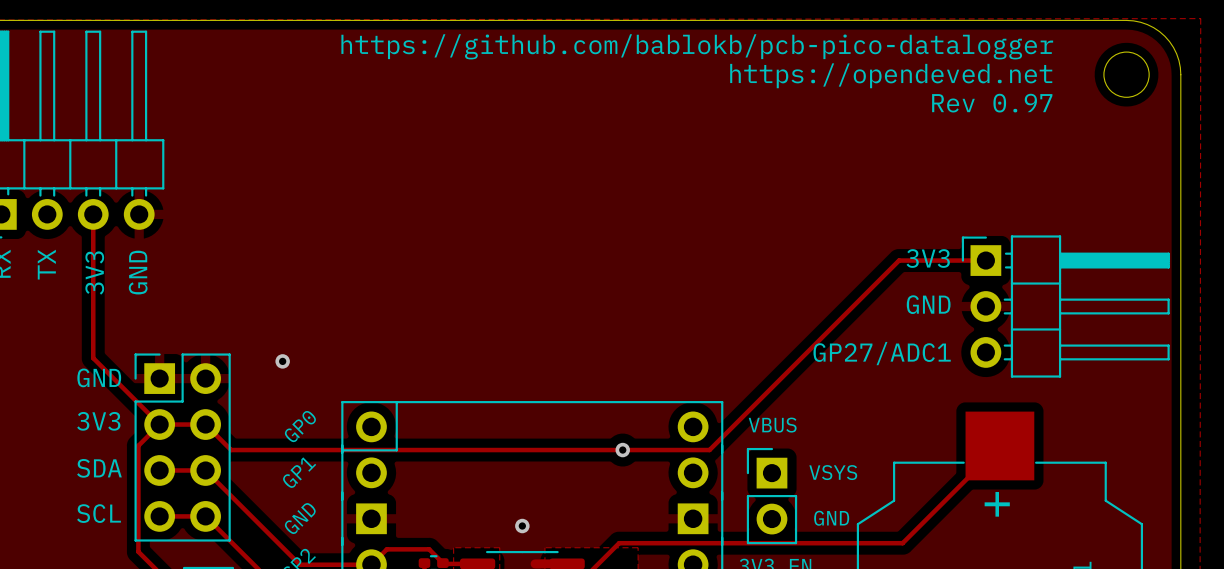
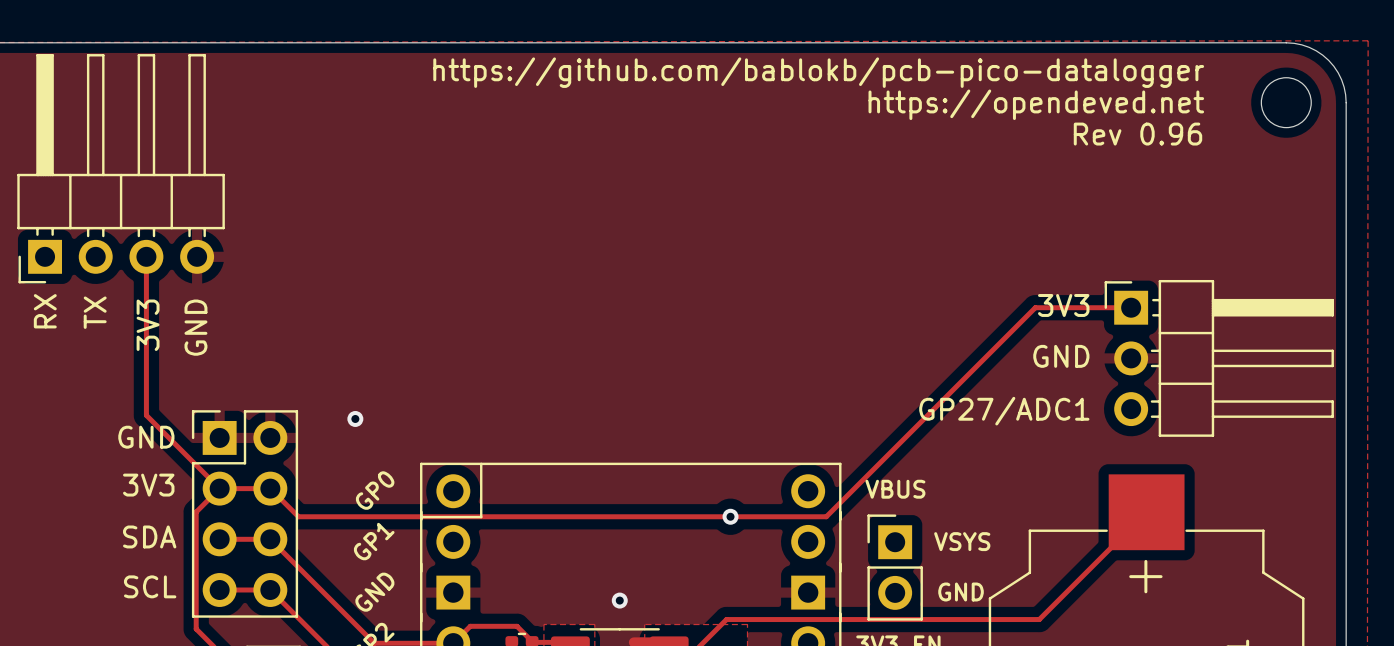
text: Rev 0.97 (992, 103) -> Rev 0.96 (1137, 134)

